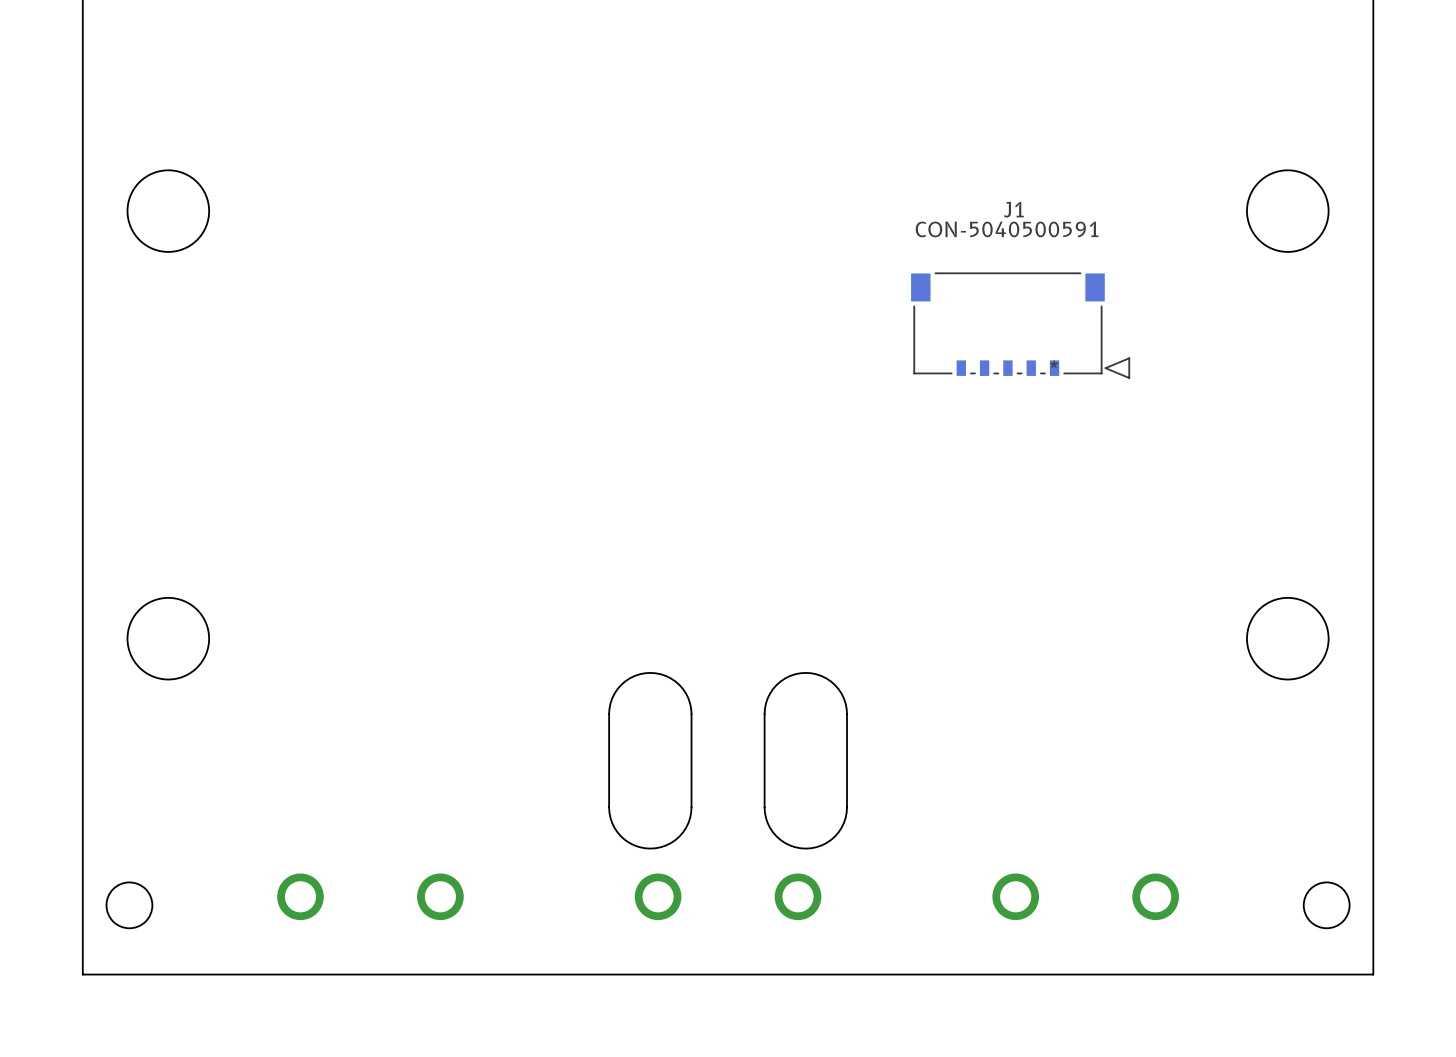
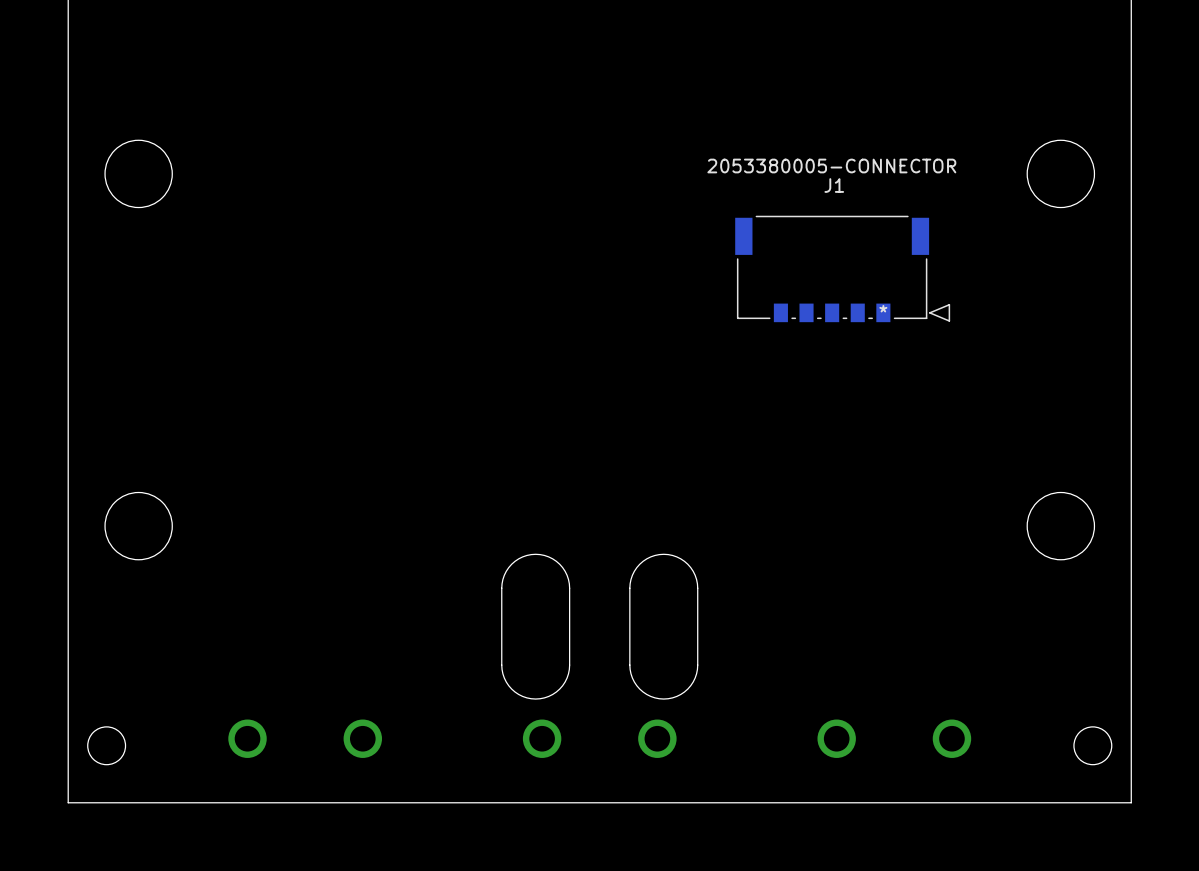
J1 value: CON-5040500591 (1007, 229) -> 2053380005-CONNECTOR (831, 166)
J1 footprint: [911, 272, 1131, 379] -> [735, 215, 951, 323]

